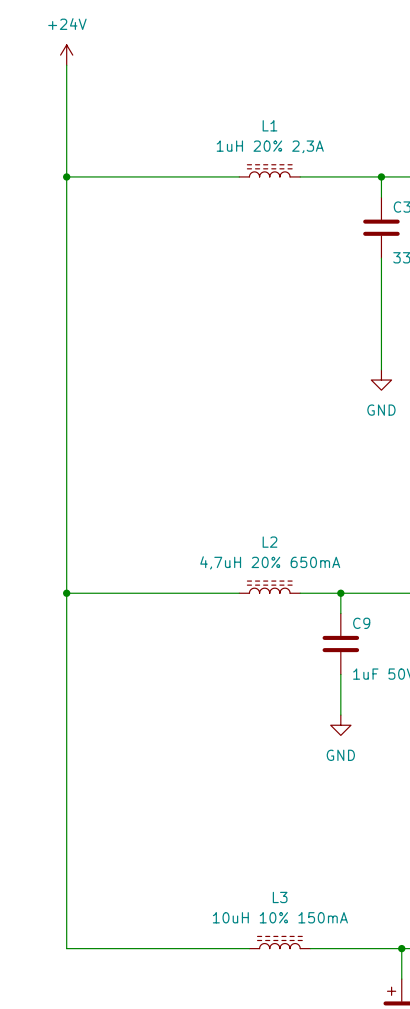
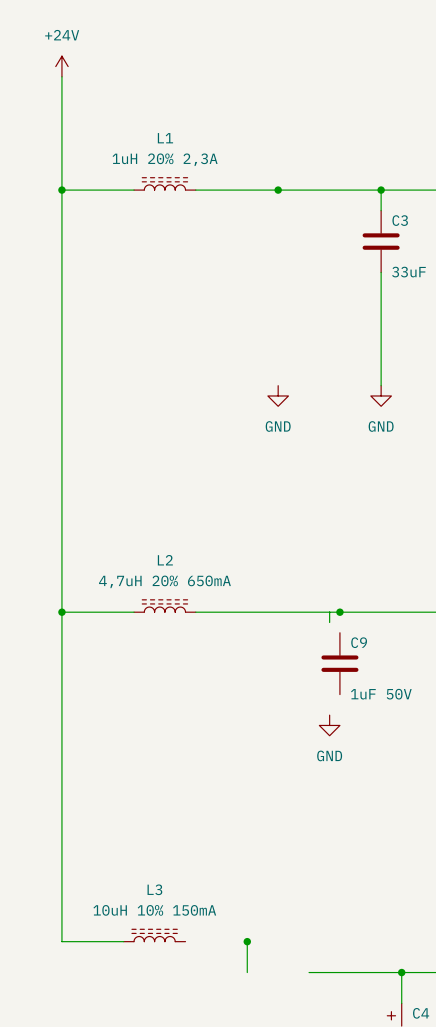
L1 position: (269, 170) -> (164, 183)
wire: (137, 176) (198, 176) -> (236, 190) (298, 190)
junction: none -> (278, 190)
power symbol: none -> GND (278, 395)
L2 position: (269, 587) -> (164, 606)
wire: (137, 593) (198, 593) -> (236, 612) (298, 612)
wire: none -> (329, 612) (329, 622)
wire: (340, 593) (340, 613) -> none
wire: (340, 674) (340, 715) -> none
power symbol position: GND (340, 725) -> GND (329, 725)
wire: (66, 918) (66, 948) (249, 948) -> (61, 941) (123, 941)
wire: none -> (247, 941) (247, 972)
junction: none -> (247, 941)
L3 position: (279, 942) -> (154, 935)

